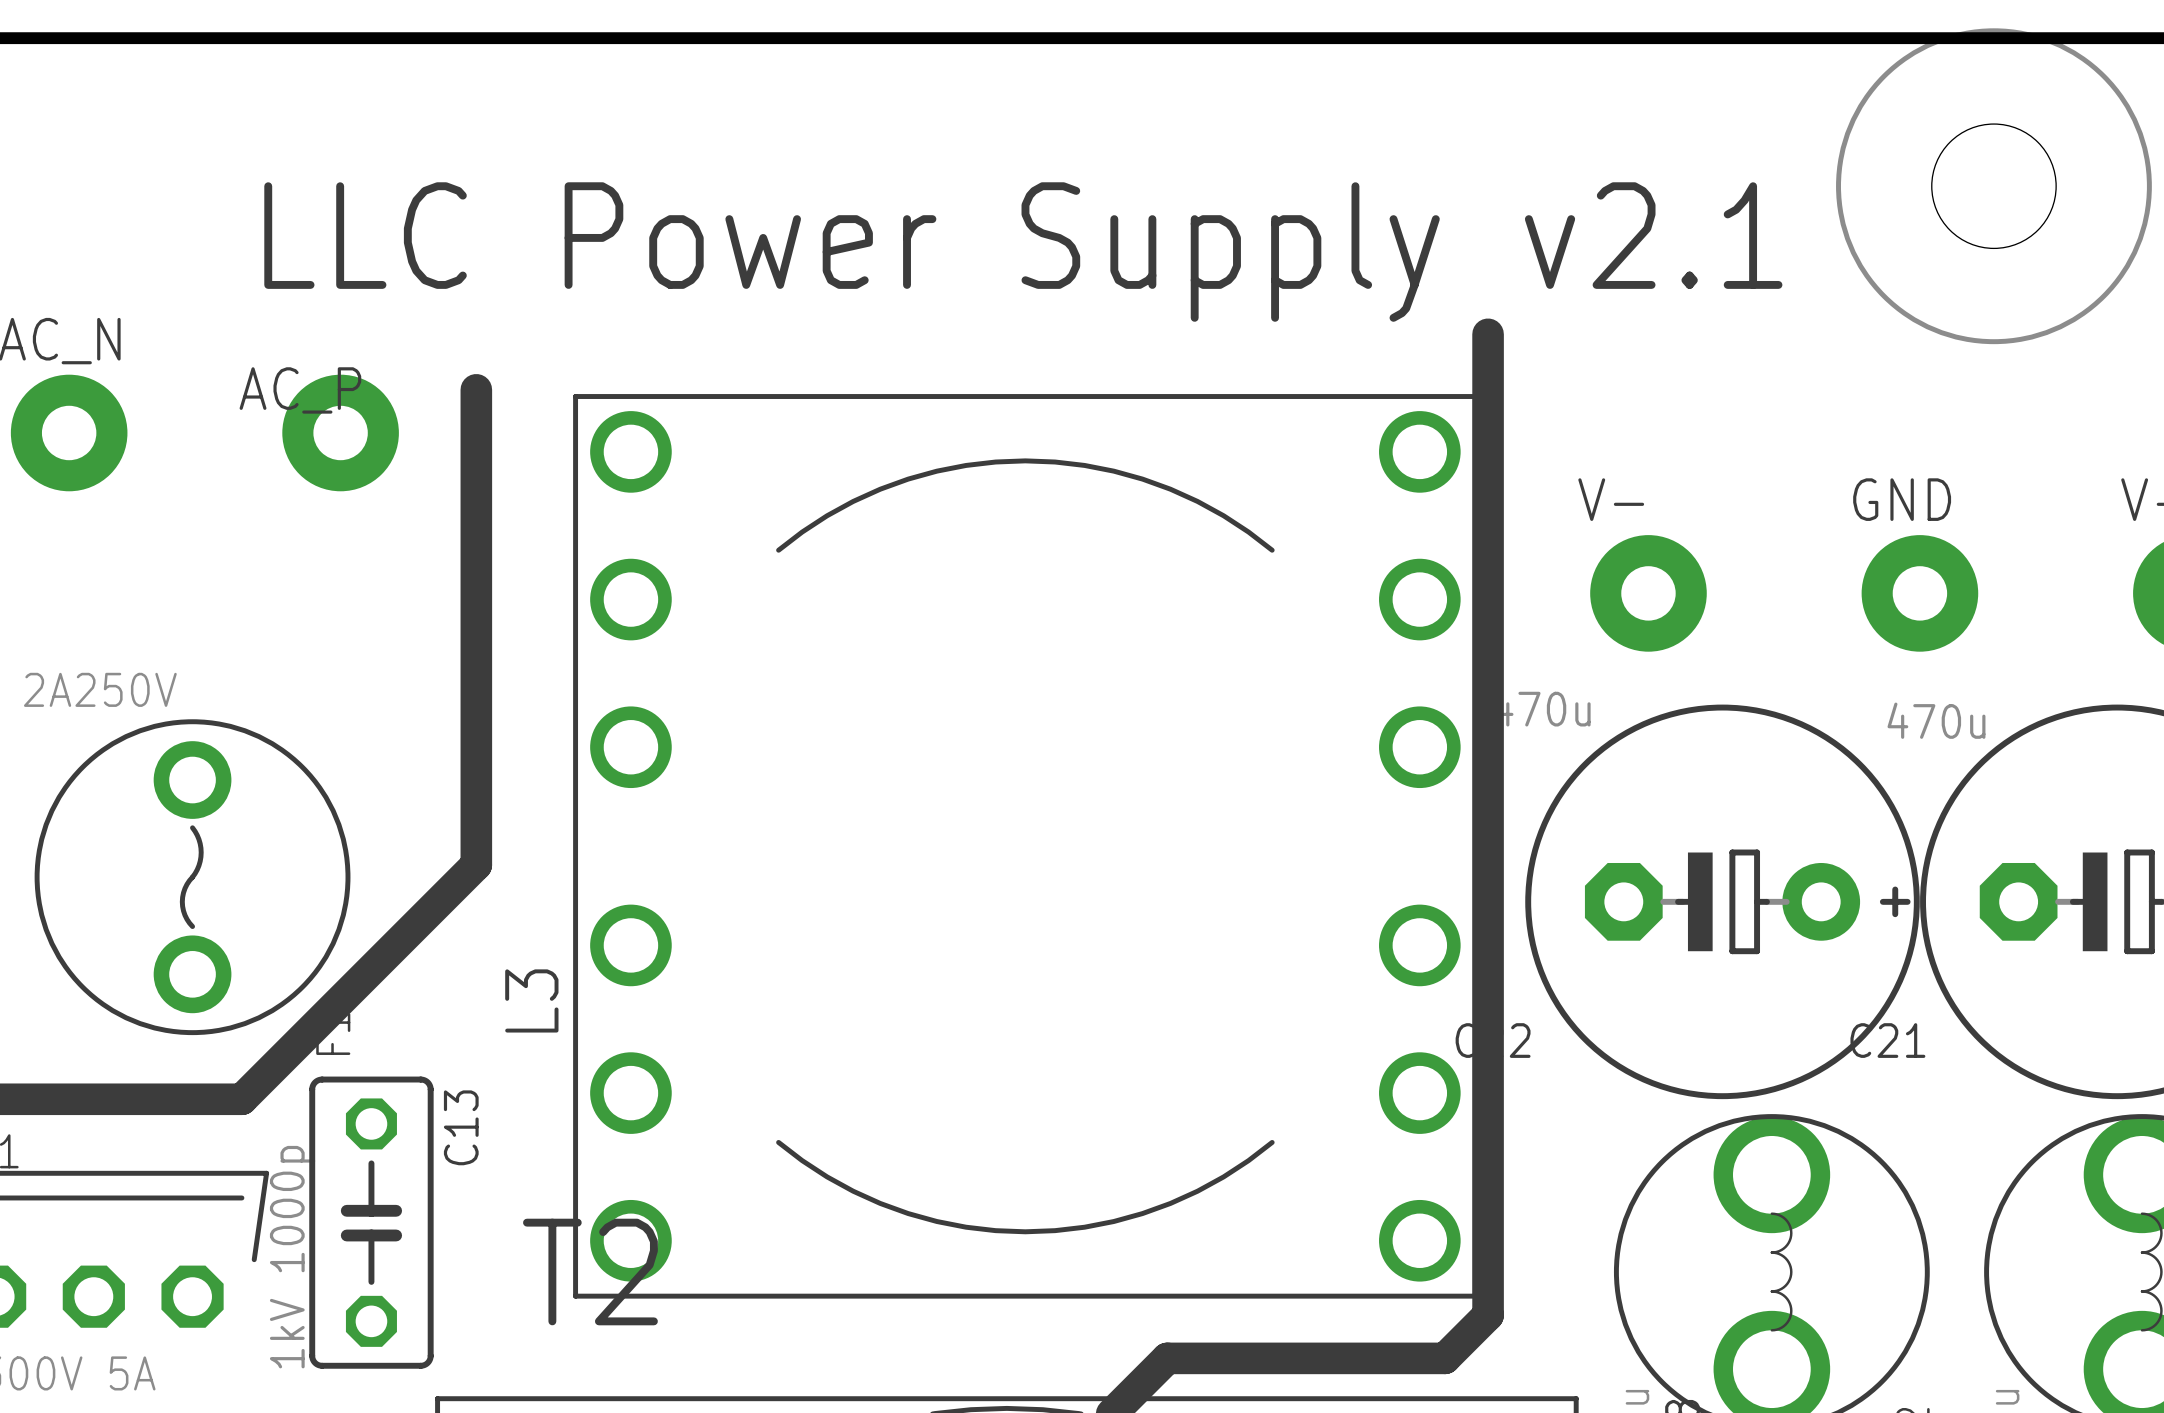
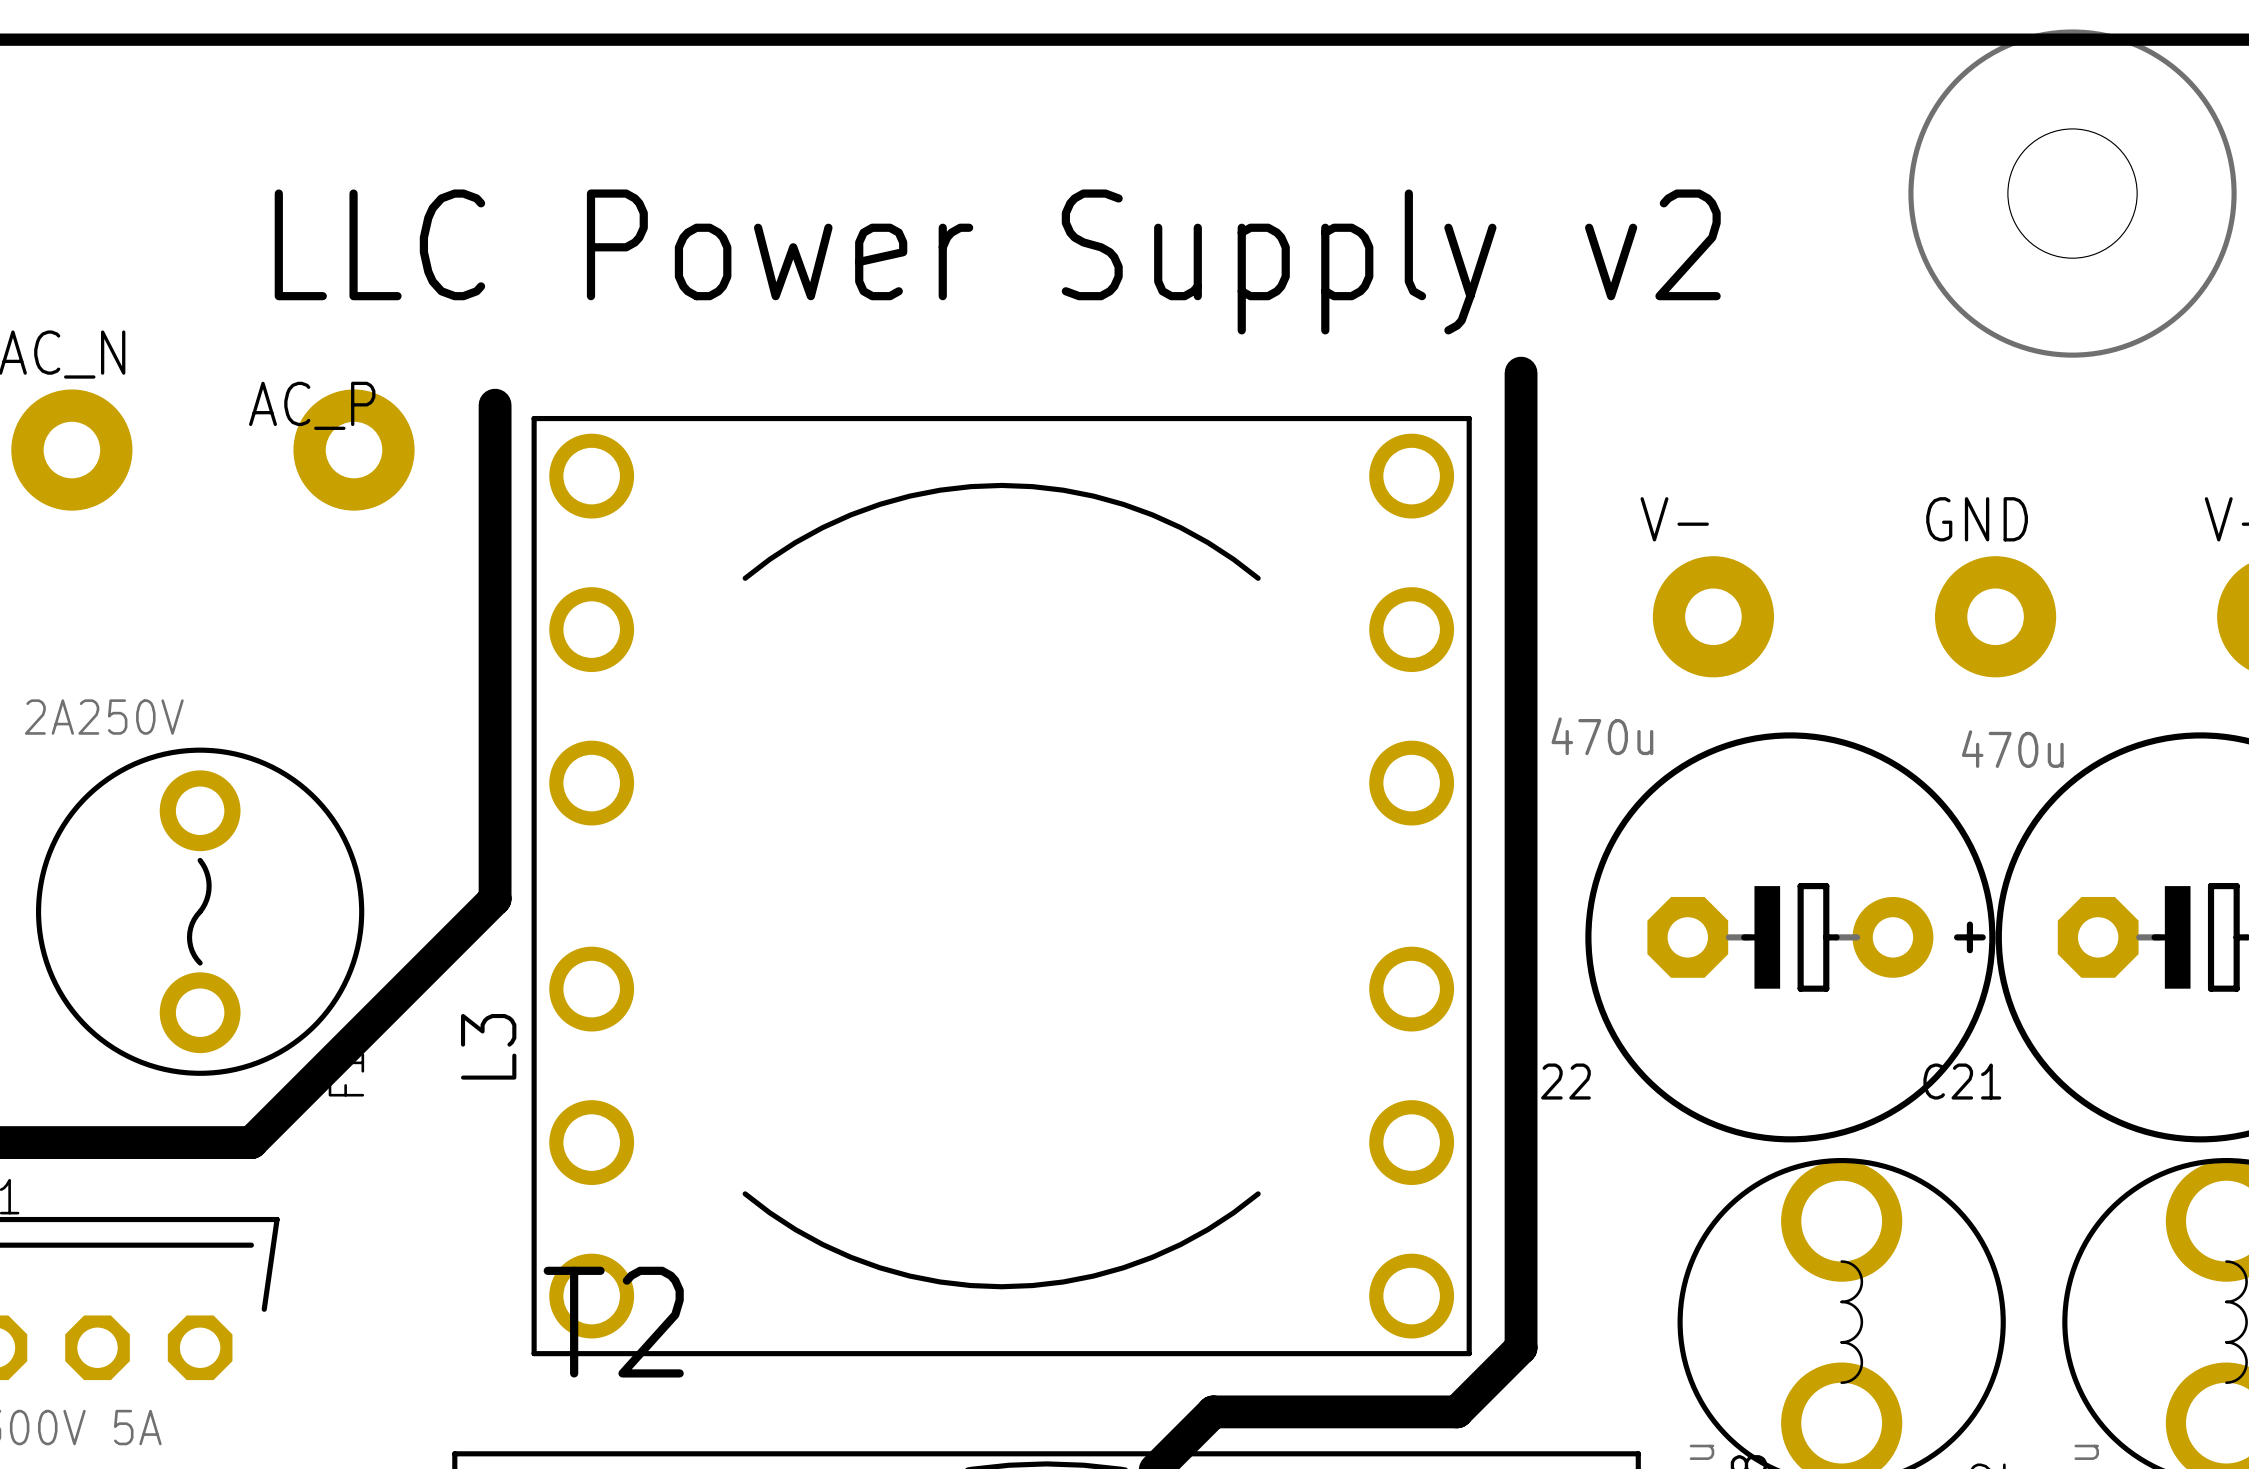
text: LLC Power Supply v2.1 (1023, 252) -> LLC Power Supply v2 (997, 261)
line: (1488, 334) (1488, 1315) (1444, 1358) (1401, 1358) -> (1521, 373) (1521, 1347) (1456, 1411)
L3 position: (1025, 846) -> (1001, 886)
C13: 1kV 1000p (371, 1222) -> none

